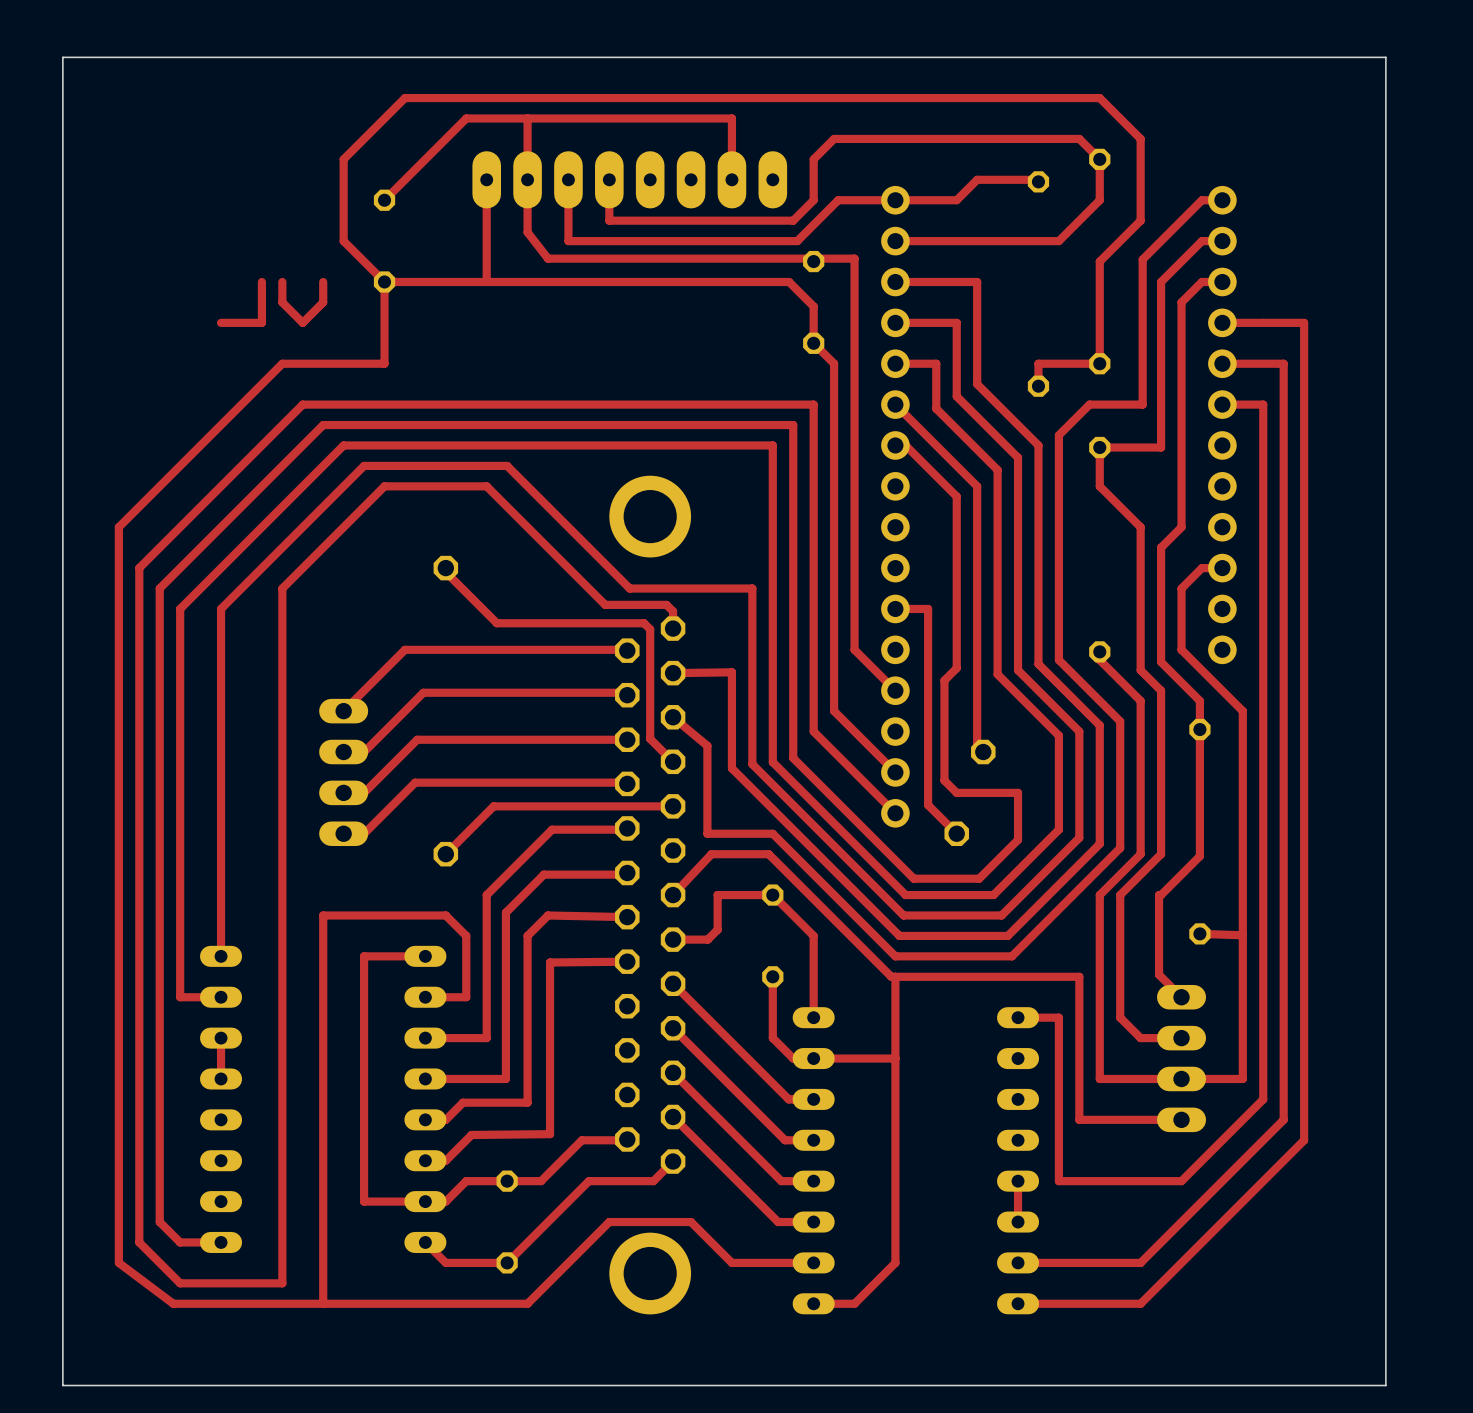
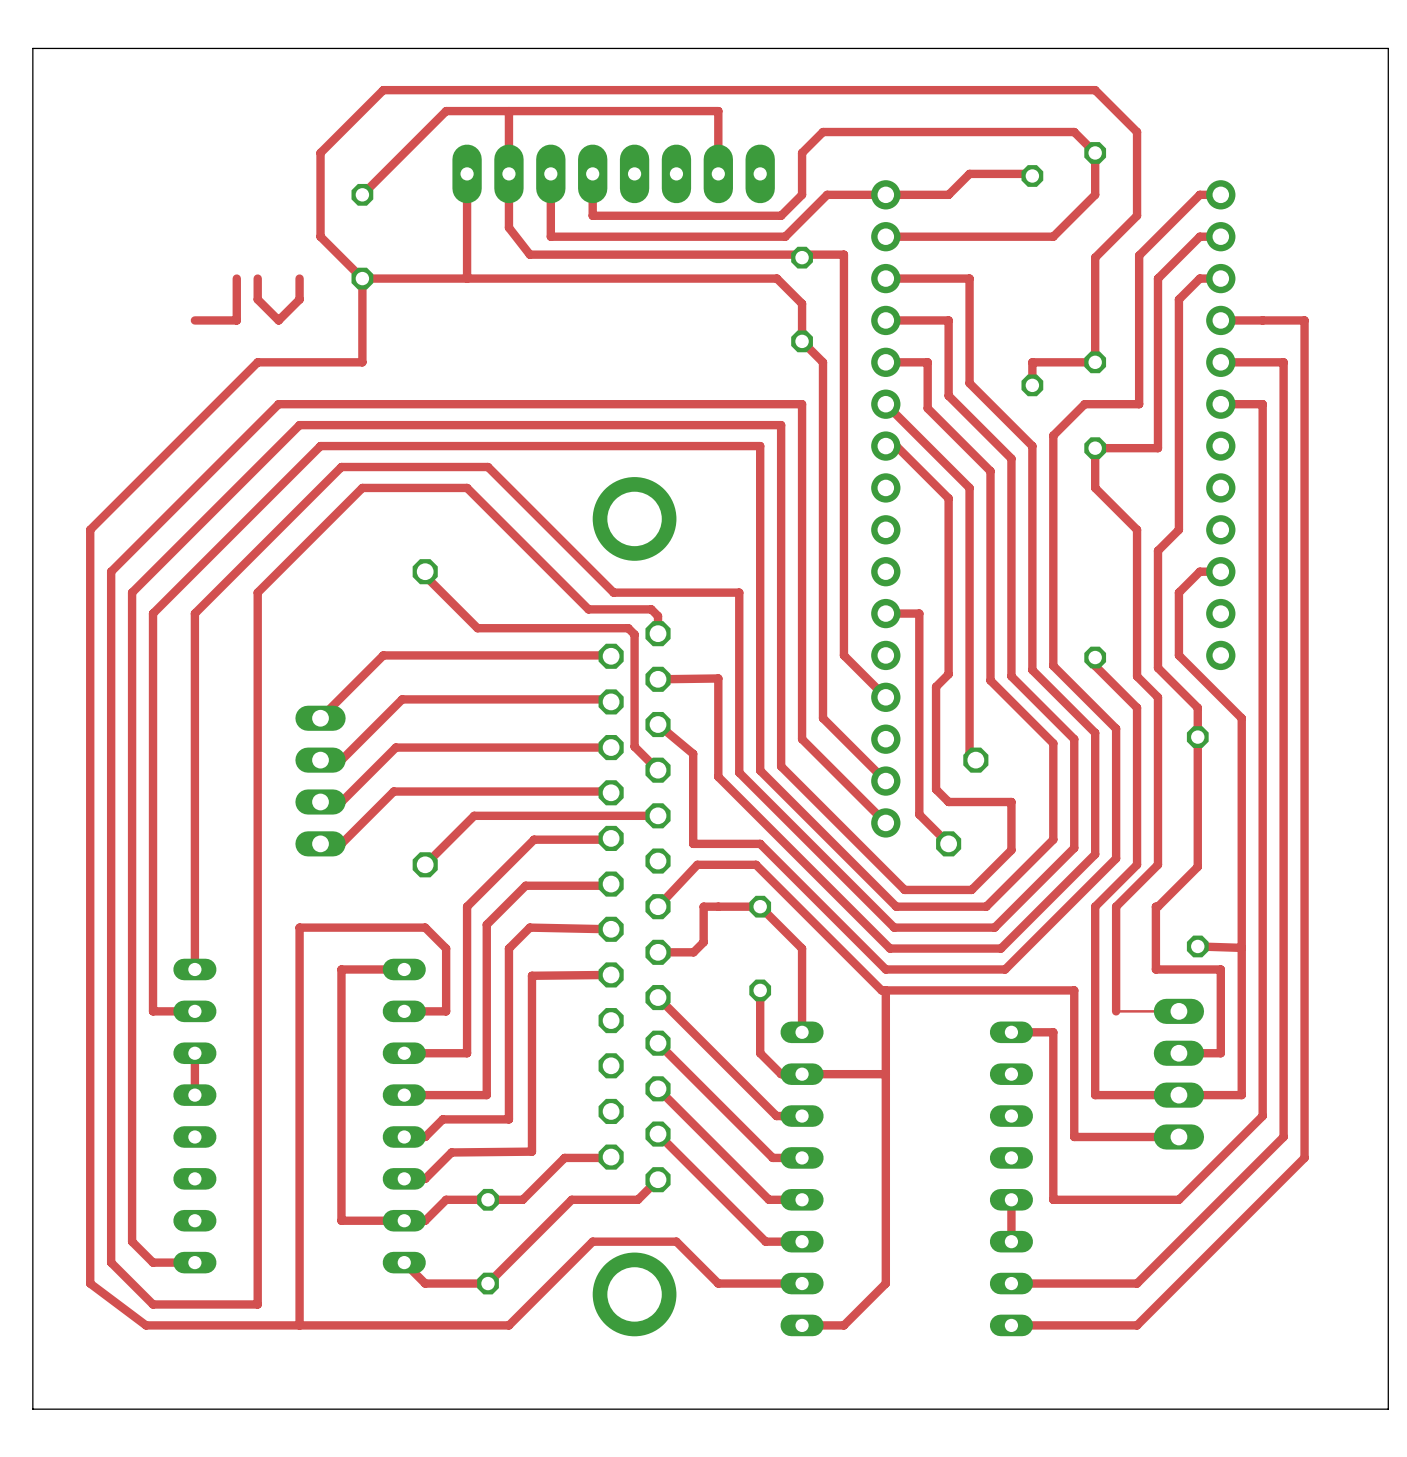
top track: (1159, 956) (1159, 974) (1181, 997) -> (1155, 969) (1220, 969) (1220, 1053) (1178, 1053)
top track: (1120, 997) (1120, 1017) (1140, 1038) (1181, 1038) -> (1116, 1011) (1178, 1011)

